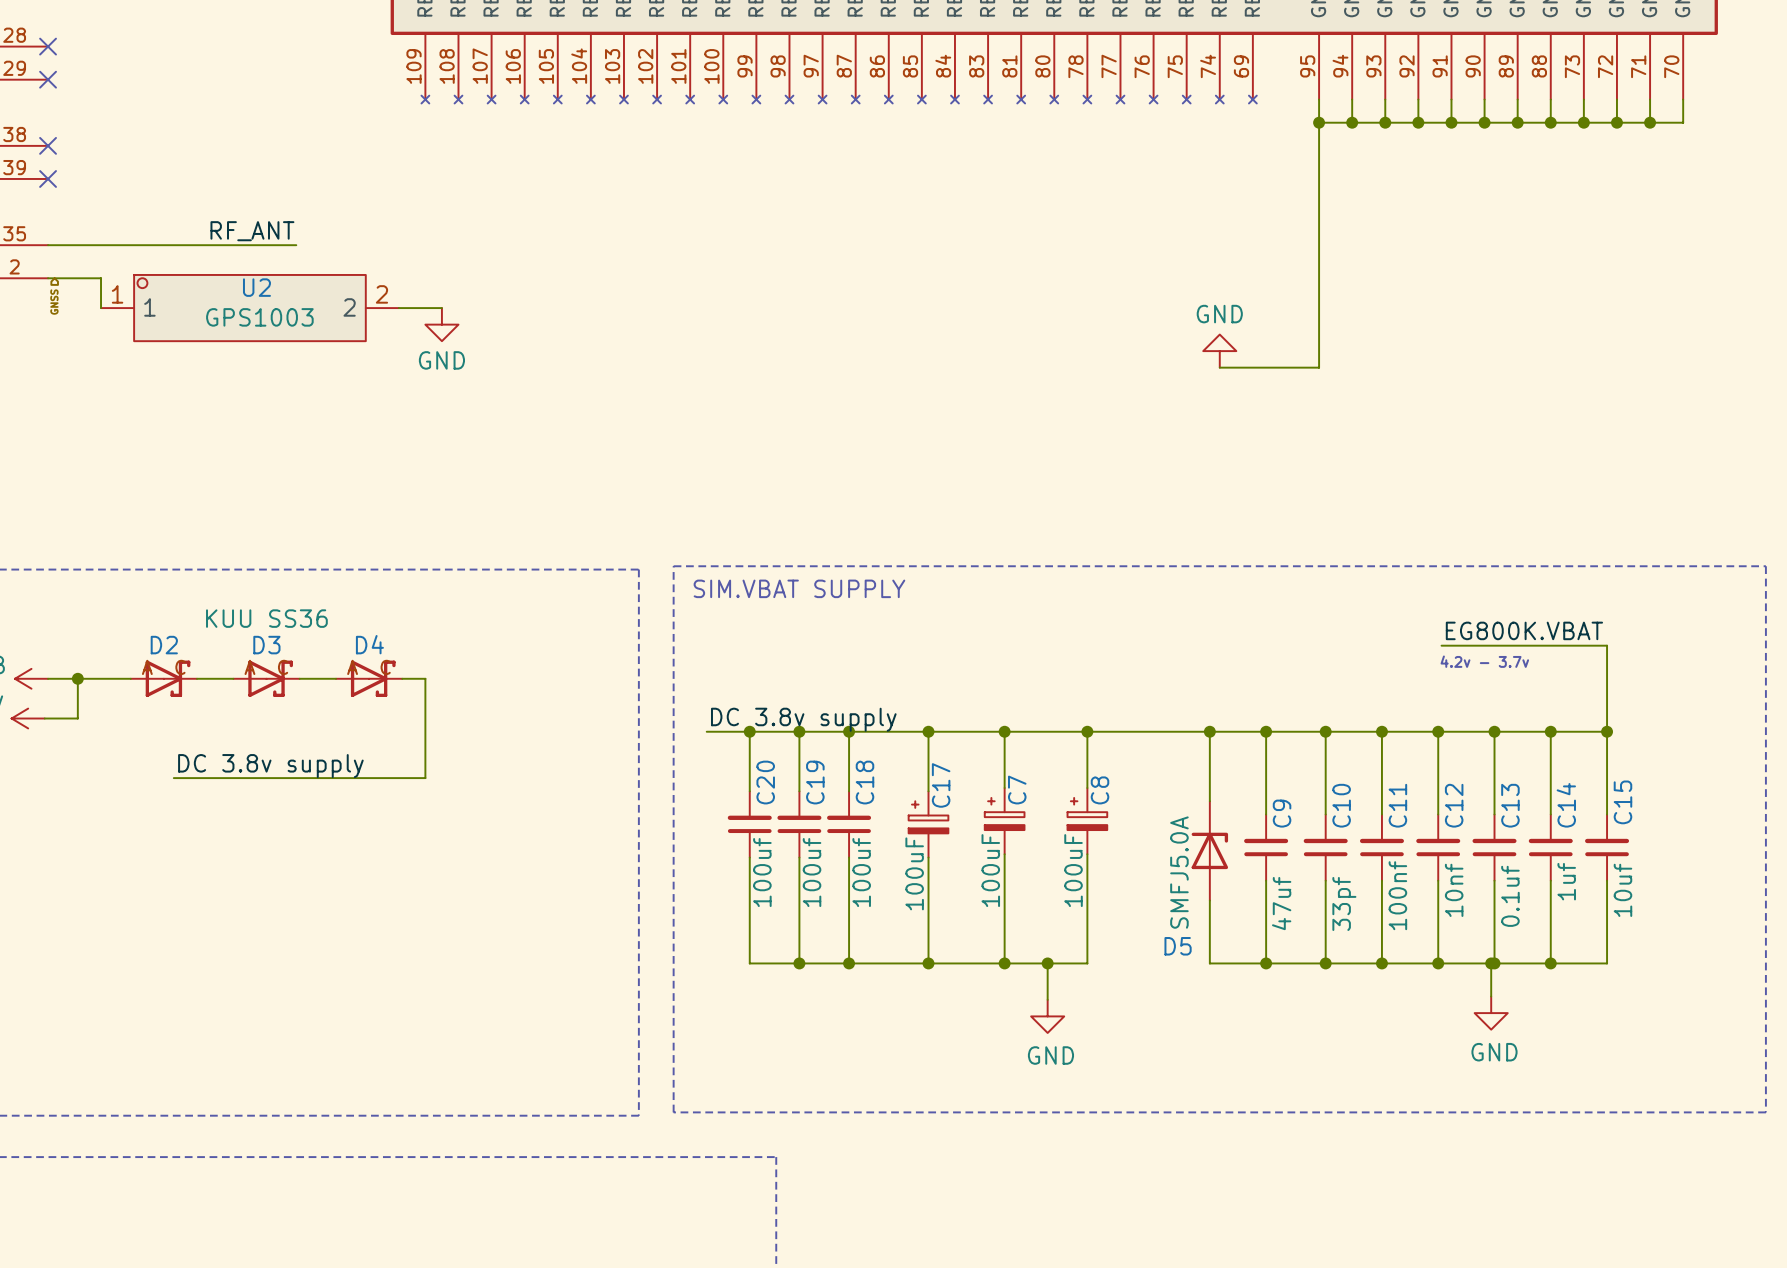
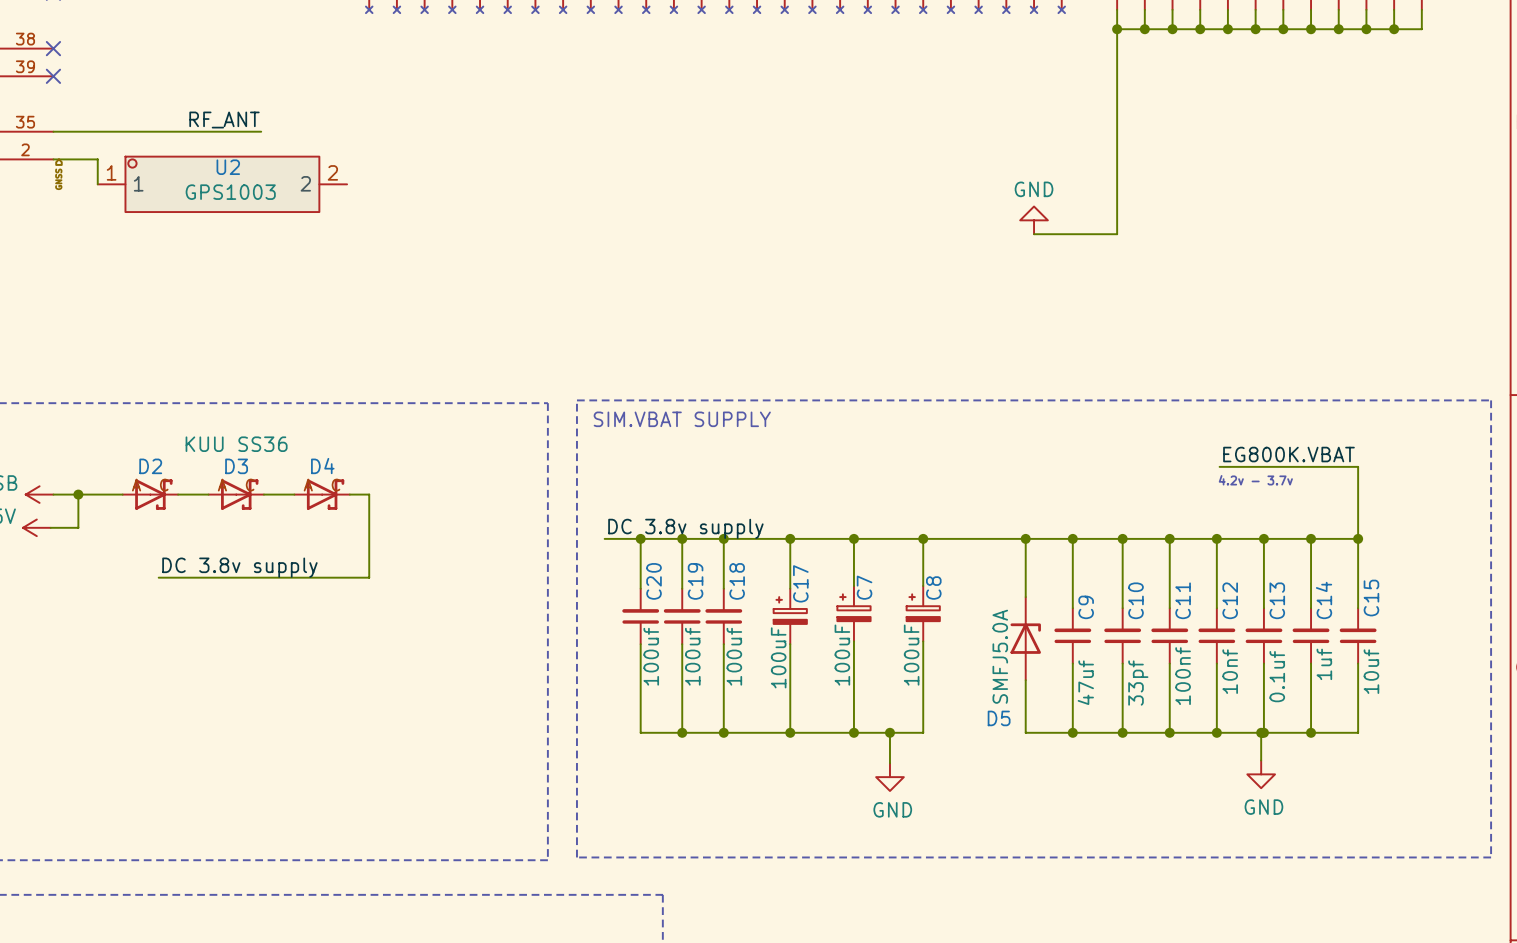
wire: (398, 308) (441, 308) -> none
power symbol: GND (441, 324) -> none

